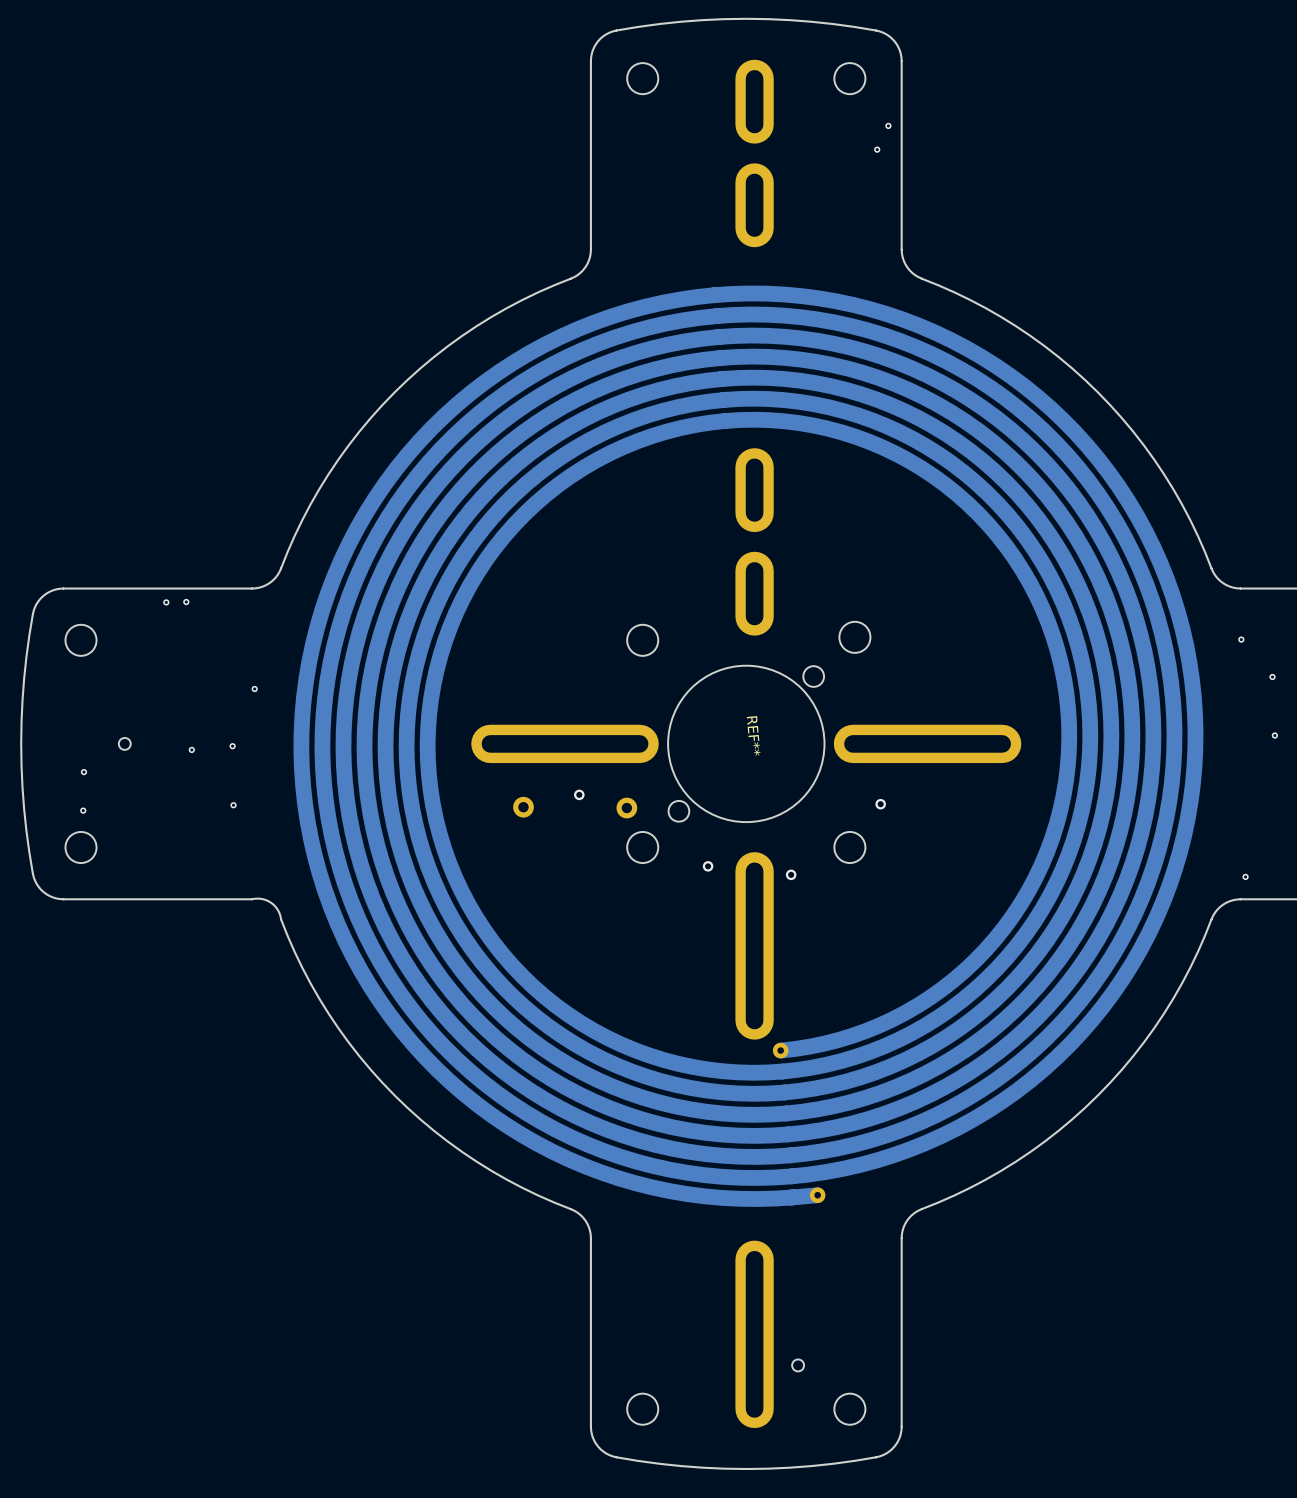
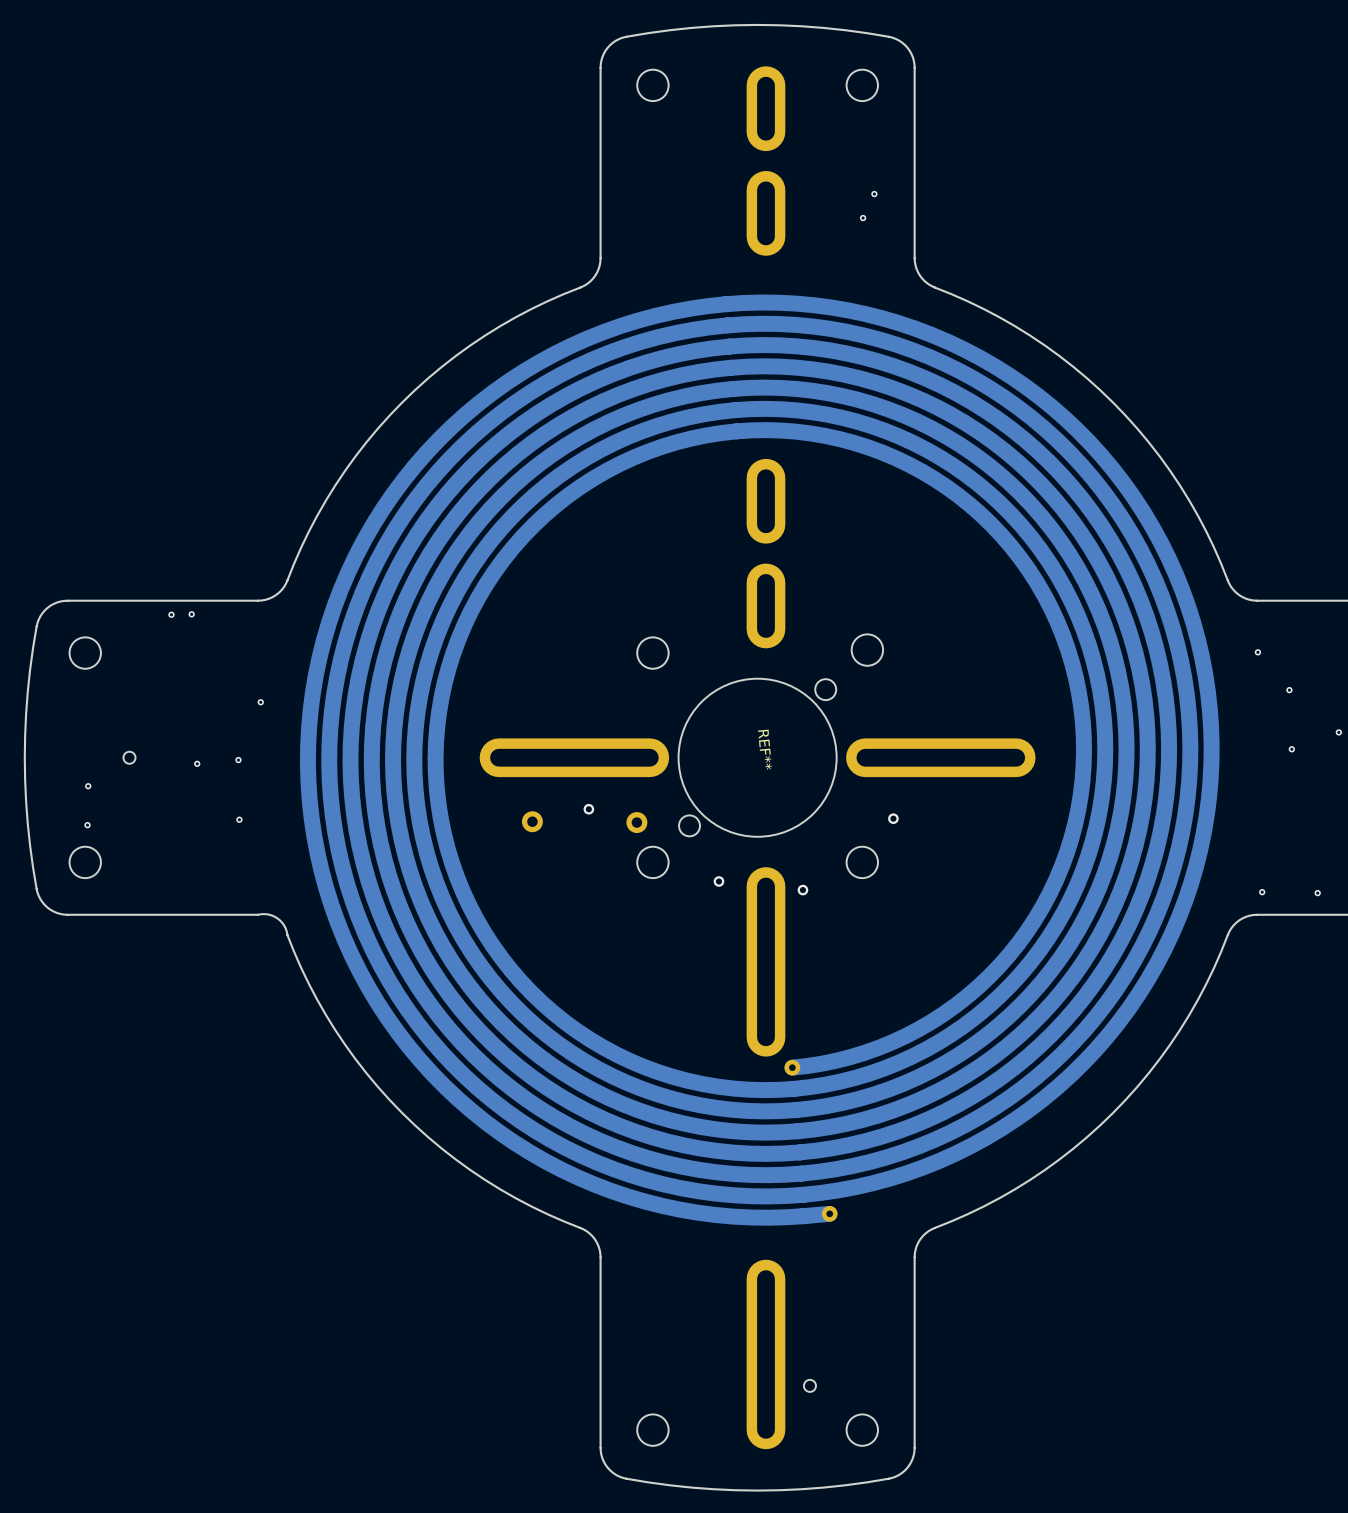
via: (888, 125) -> none
via: (877, 149) -> none
via: none -> (874, 194)
via: none -> (863, 218)

